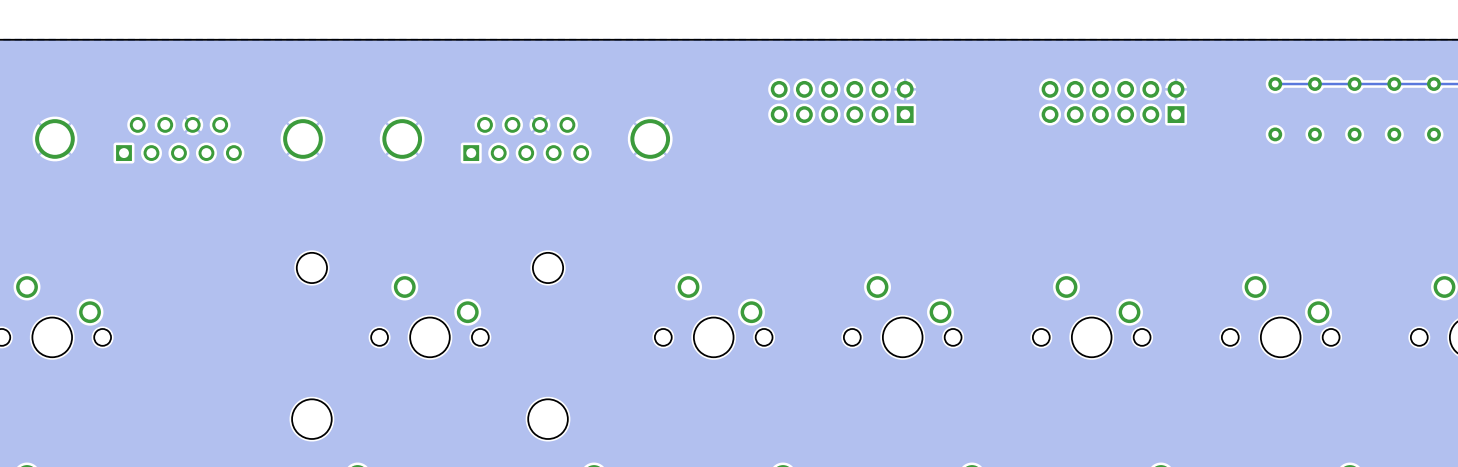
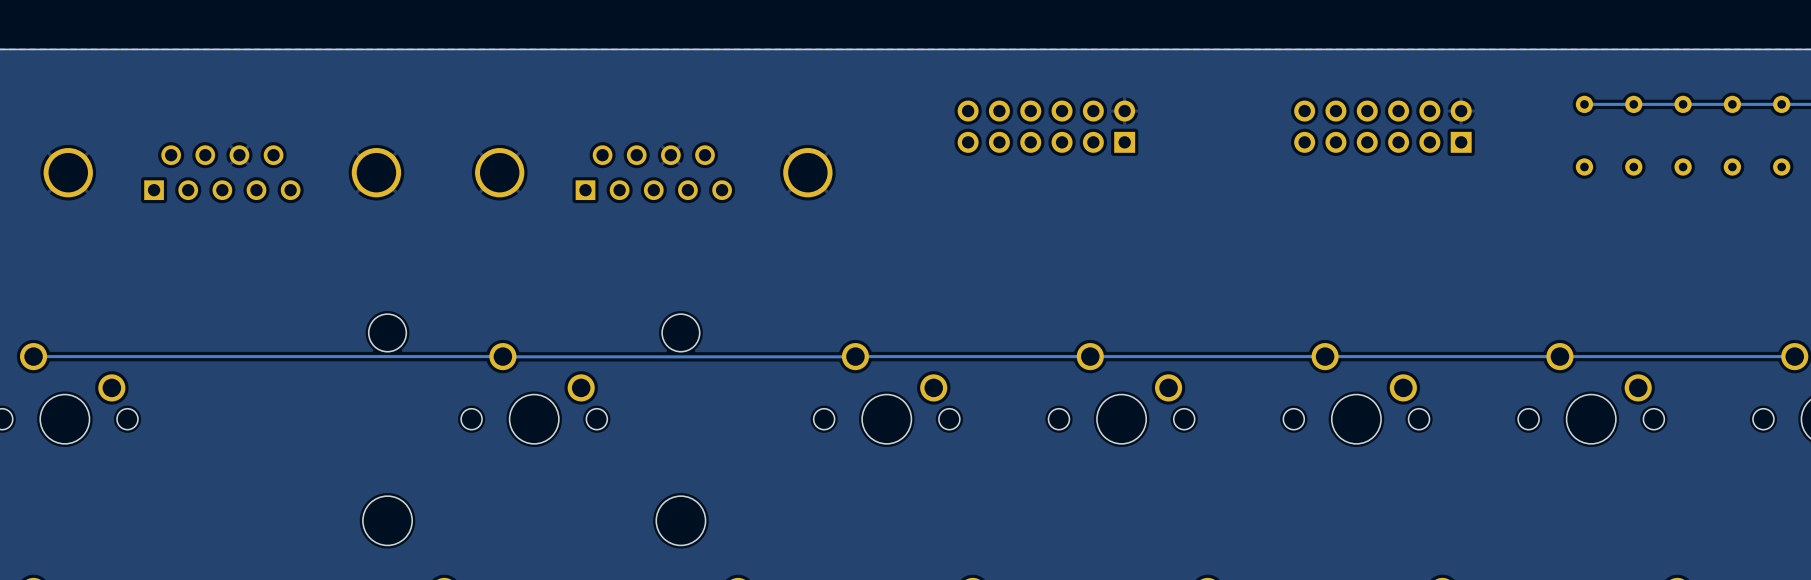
track: none -> (502, 356) (33, 356)
track: none -> (855, 356) (503, 356)
track: none -> (1794, 356) (855, 356)

